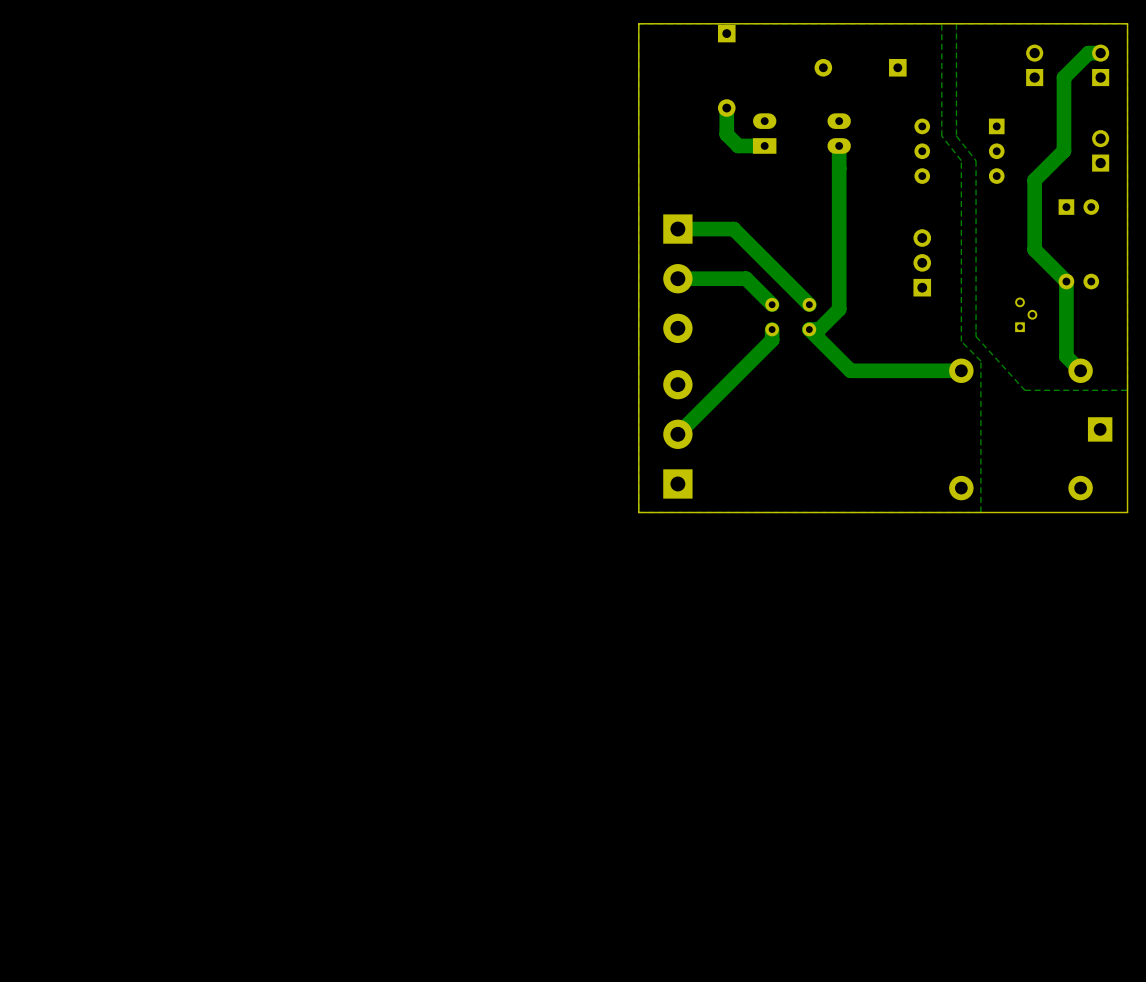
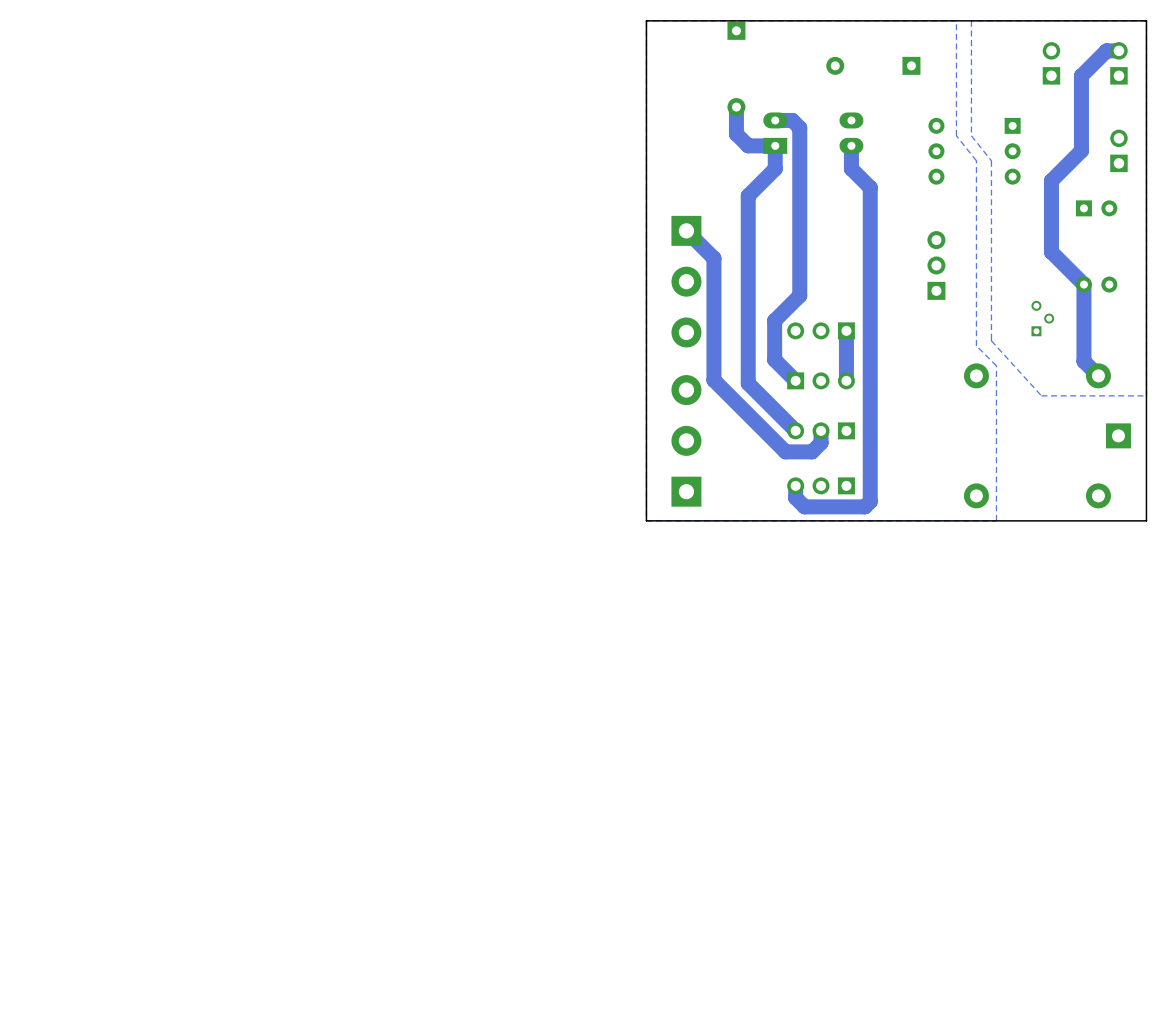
track: none -> (775, 120) (792, 120) (799, 127) (799, 295) (774, 320) (774, 359) (795, 380)
track: none -> (775, 145) (775, 168) (748, 195) (748, 383) (795, 430)
track: (839, 168) (839, 309) (819, 329) (809, 329) (850, 370) (961, 370) -> (851, 168) (870, 187) (870, 501) (864, 506) (804, 506) (795, 497) (795, 485)
track: (677, 229) (733, 229) (809, 304) -> (686, 230) (713, 258) (713, 380) (785, 451) (812, 451) (821, 442) (821, 430)
track: (677, 278) (746, 278) (772, 304) -> none
part footprint: [802, 297, 817, 337] -> [787, 322, 855, 340]
part: (772, 317) -> none
track: none -> (846, 330) (846, 380)
track: (772, 329) (772, 340) (677, 434) -> none
part: none -> (821, 380)
part: none -> (821, 430)
part: none -> (821, 485)

